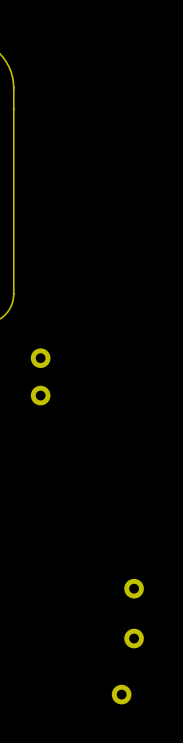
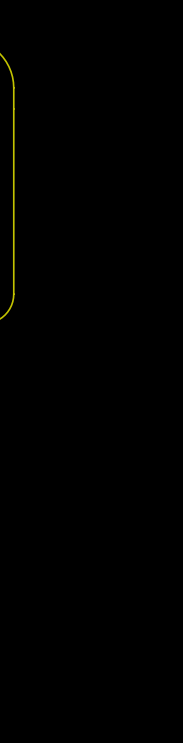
part: (40, 358) -> none
part: (40, 395) -> none
part: (134, 588) -> none
part: (134, 638) -> none
part: (121, 694) -> none

